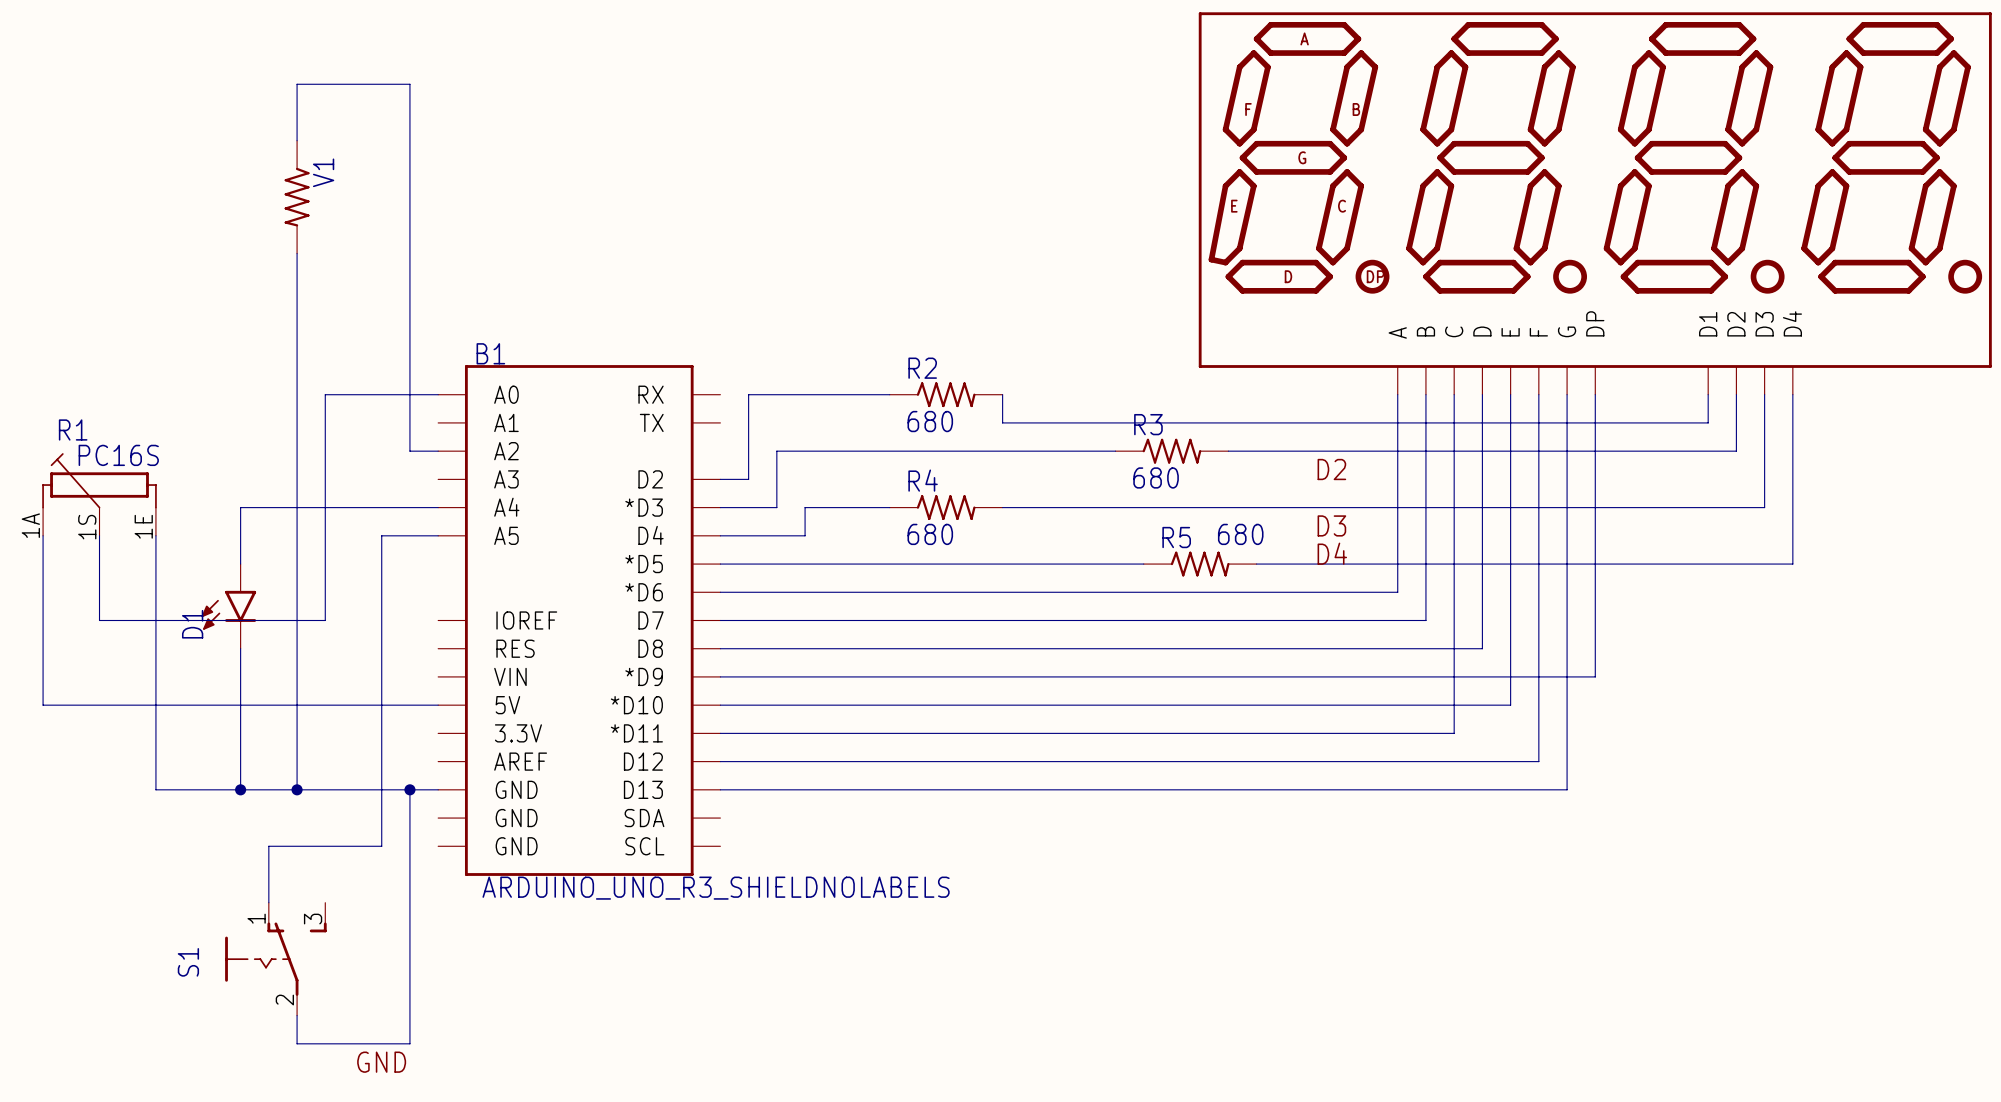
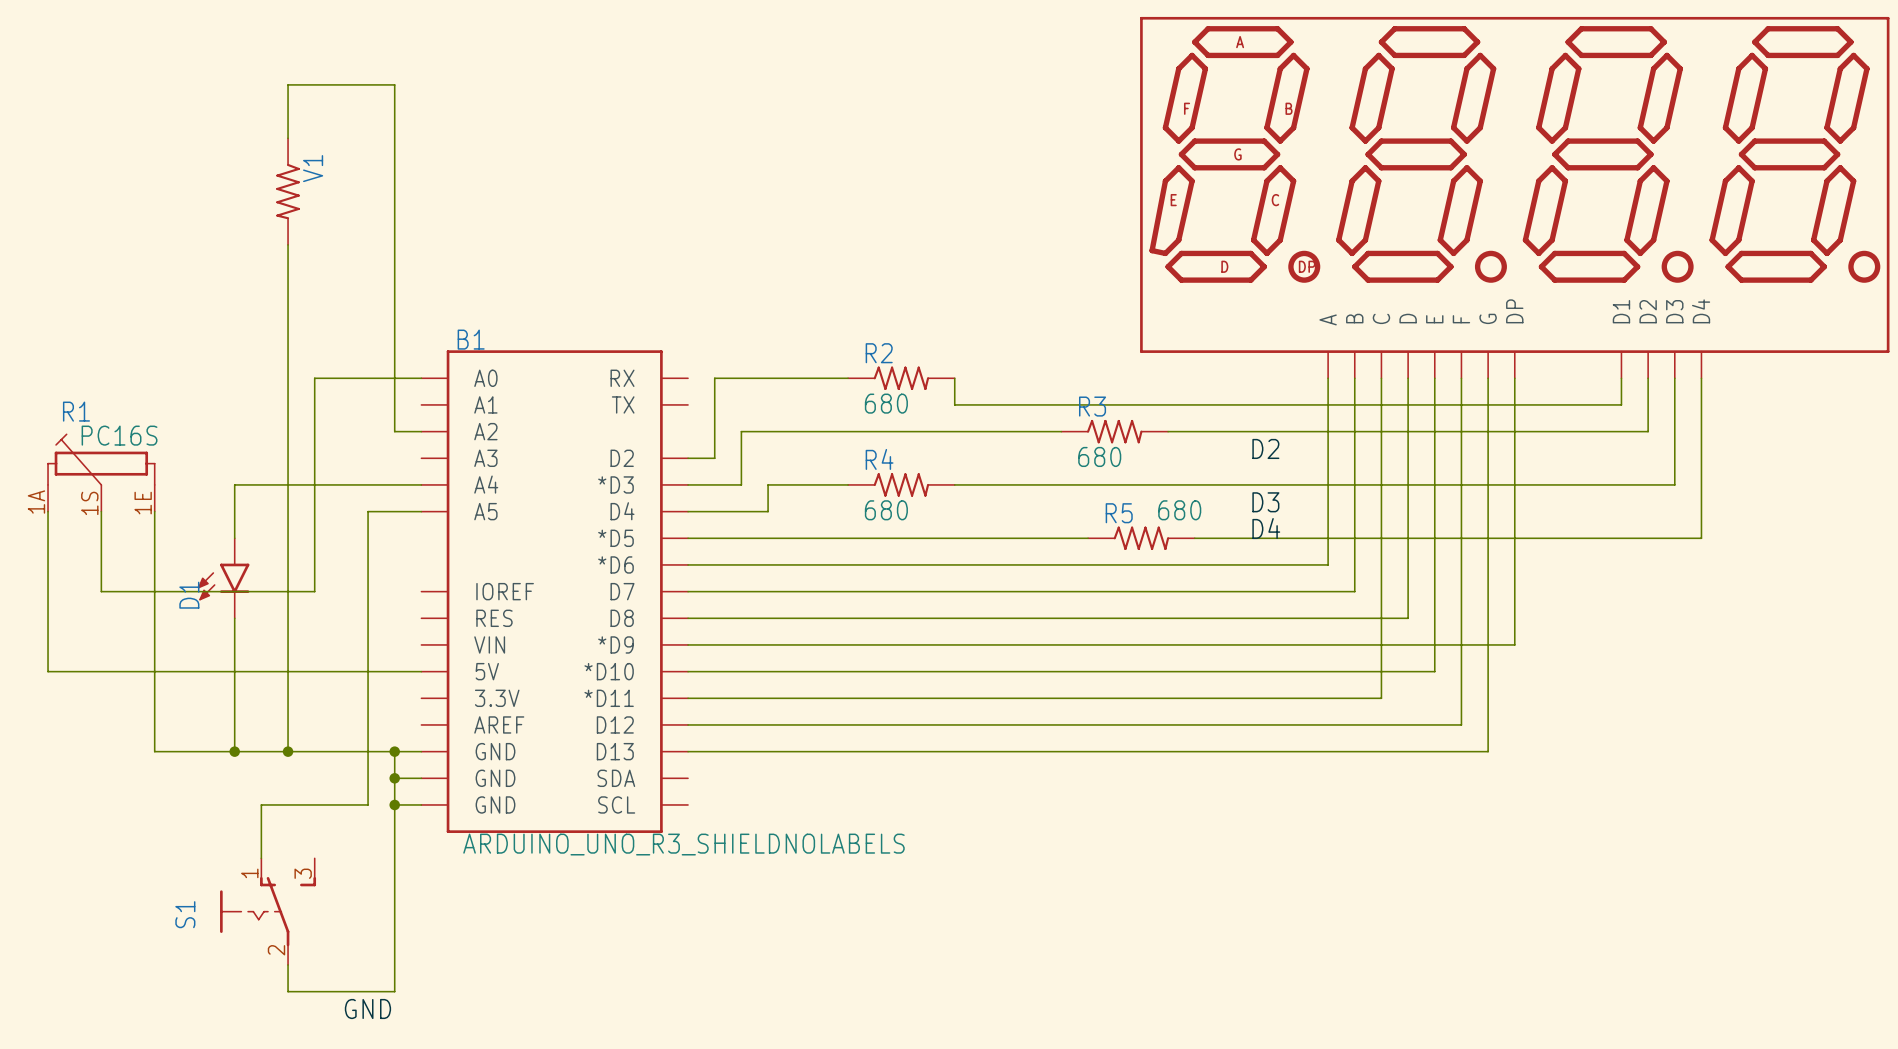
wire: none -> (394, 778) (421, 778)
junction: none -> (394, 778)
wire: none -> (394, 804) (421, 804)
junction: none -> (394, 804)

